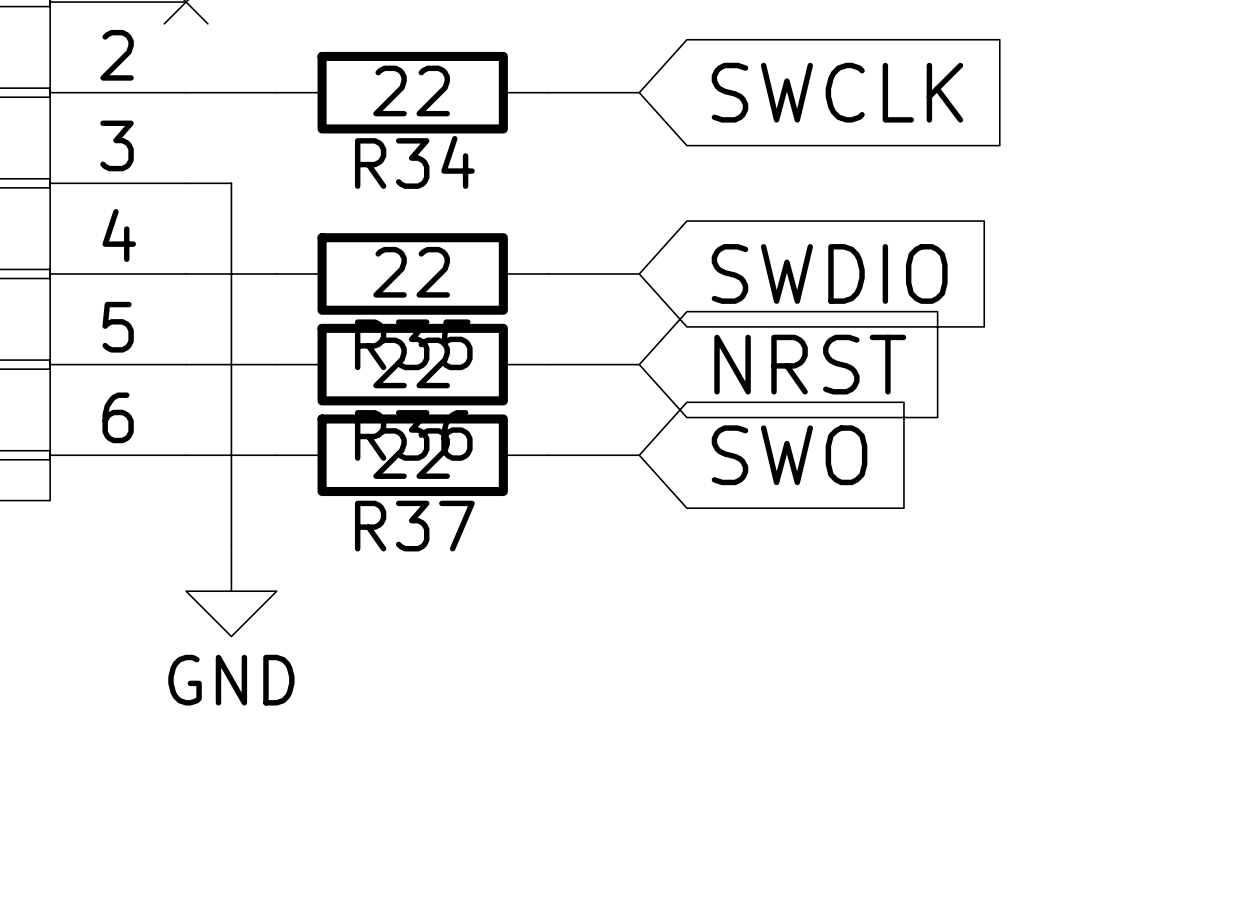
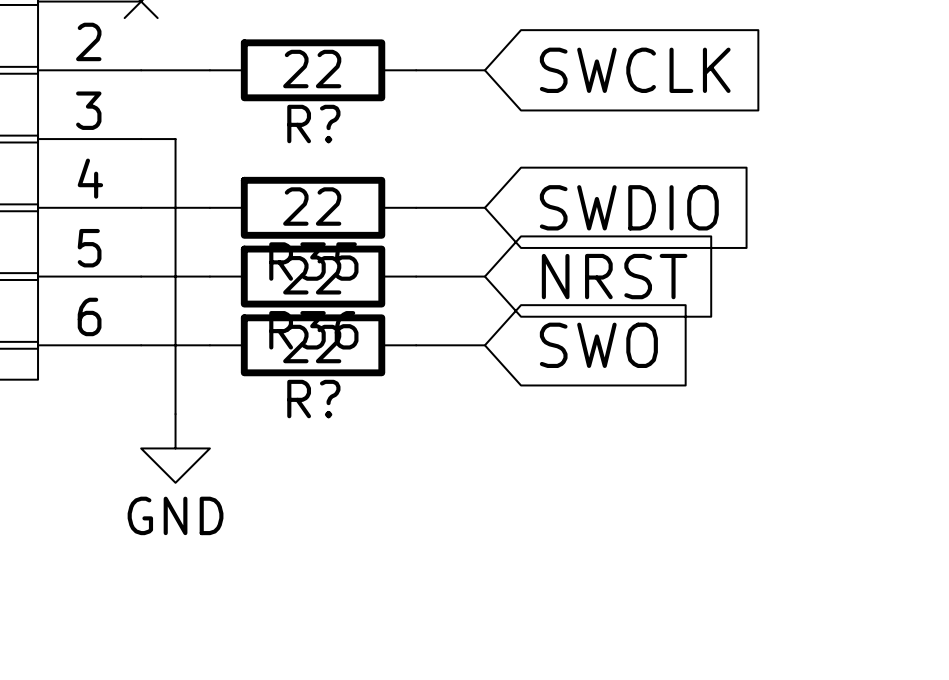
R34 name: R34 (414, 162) -> R? (313, 124)
R37 name: R37 (414, 526) -> R? (313, 399)

